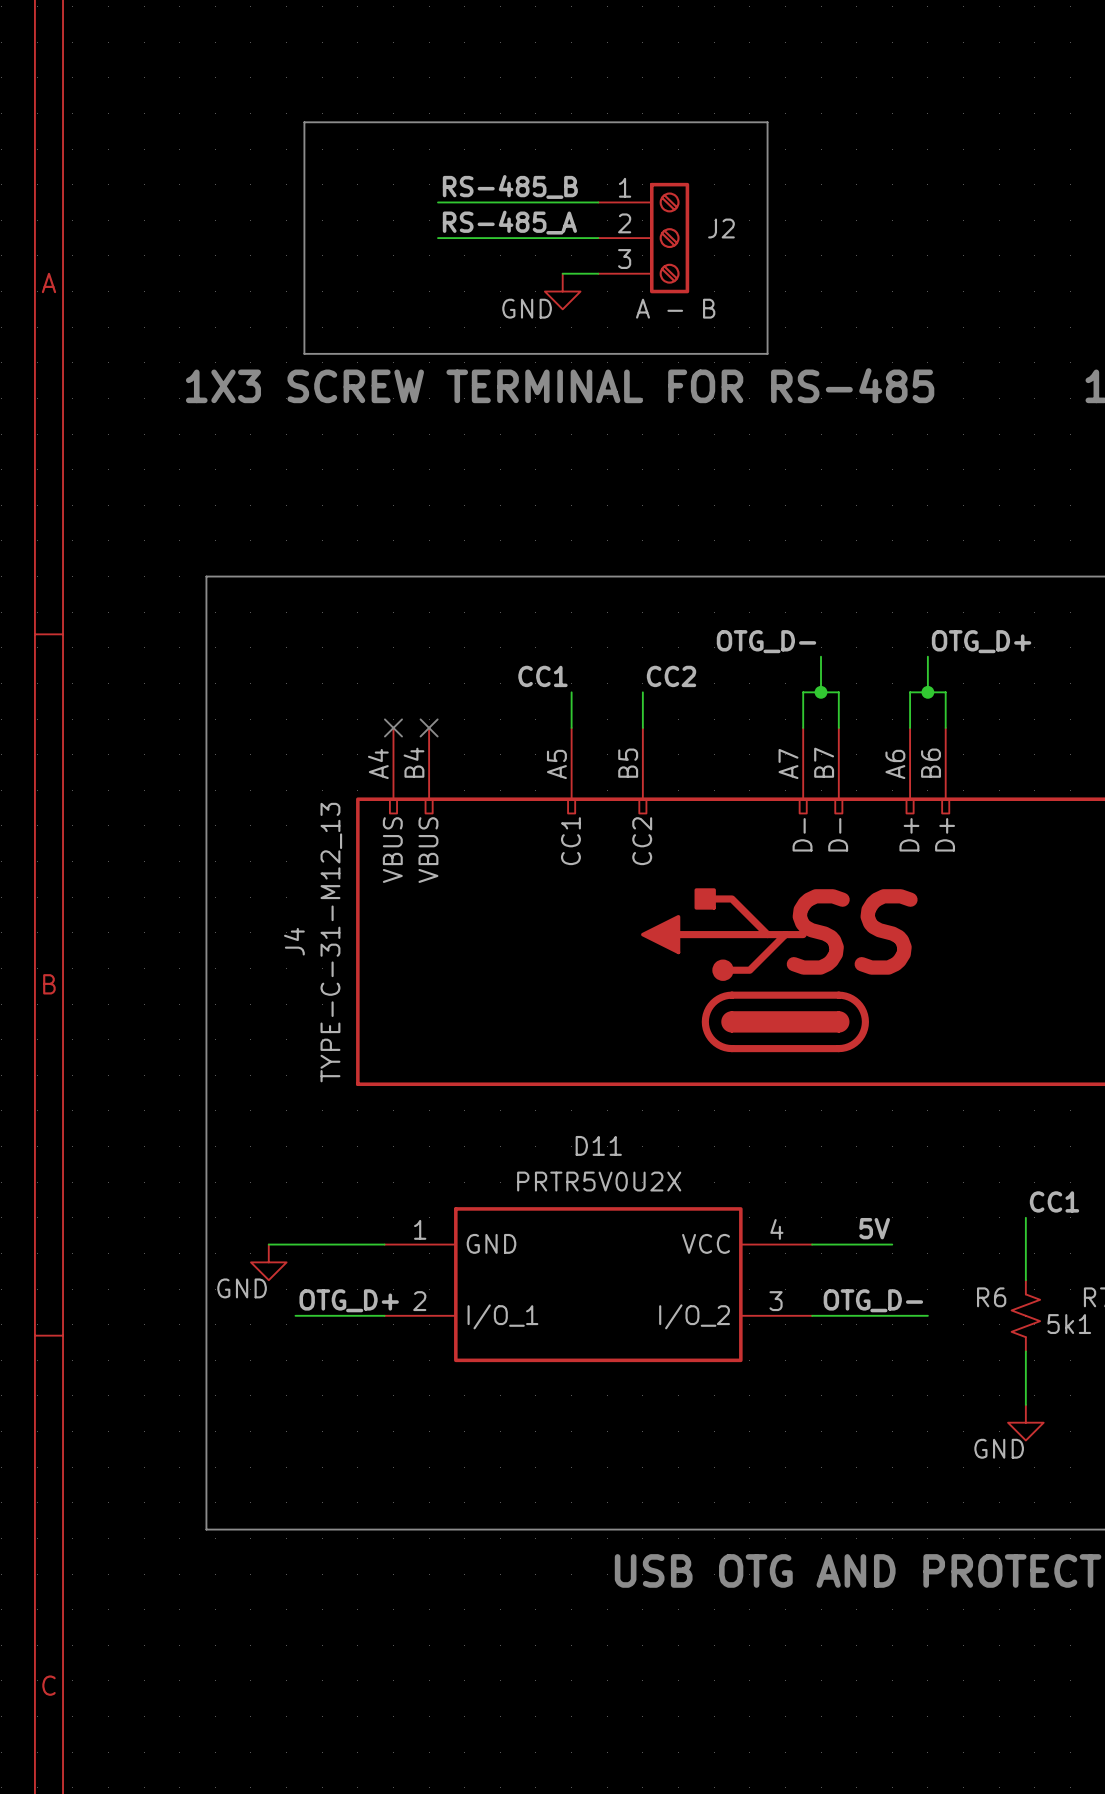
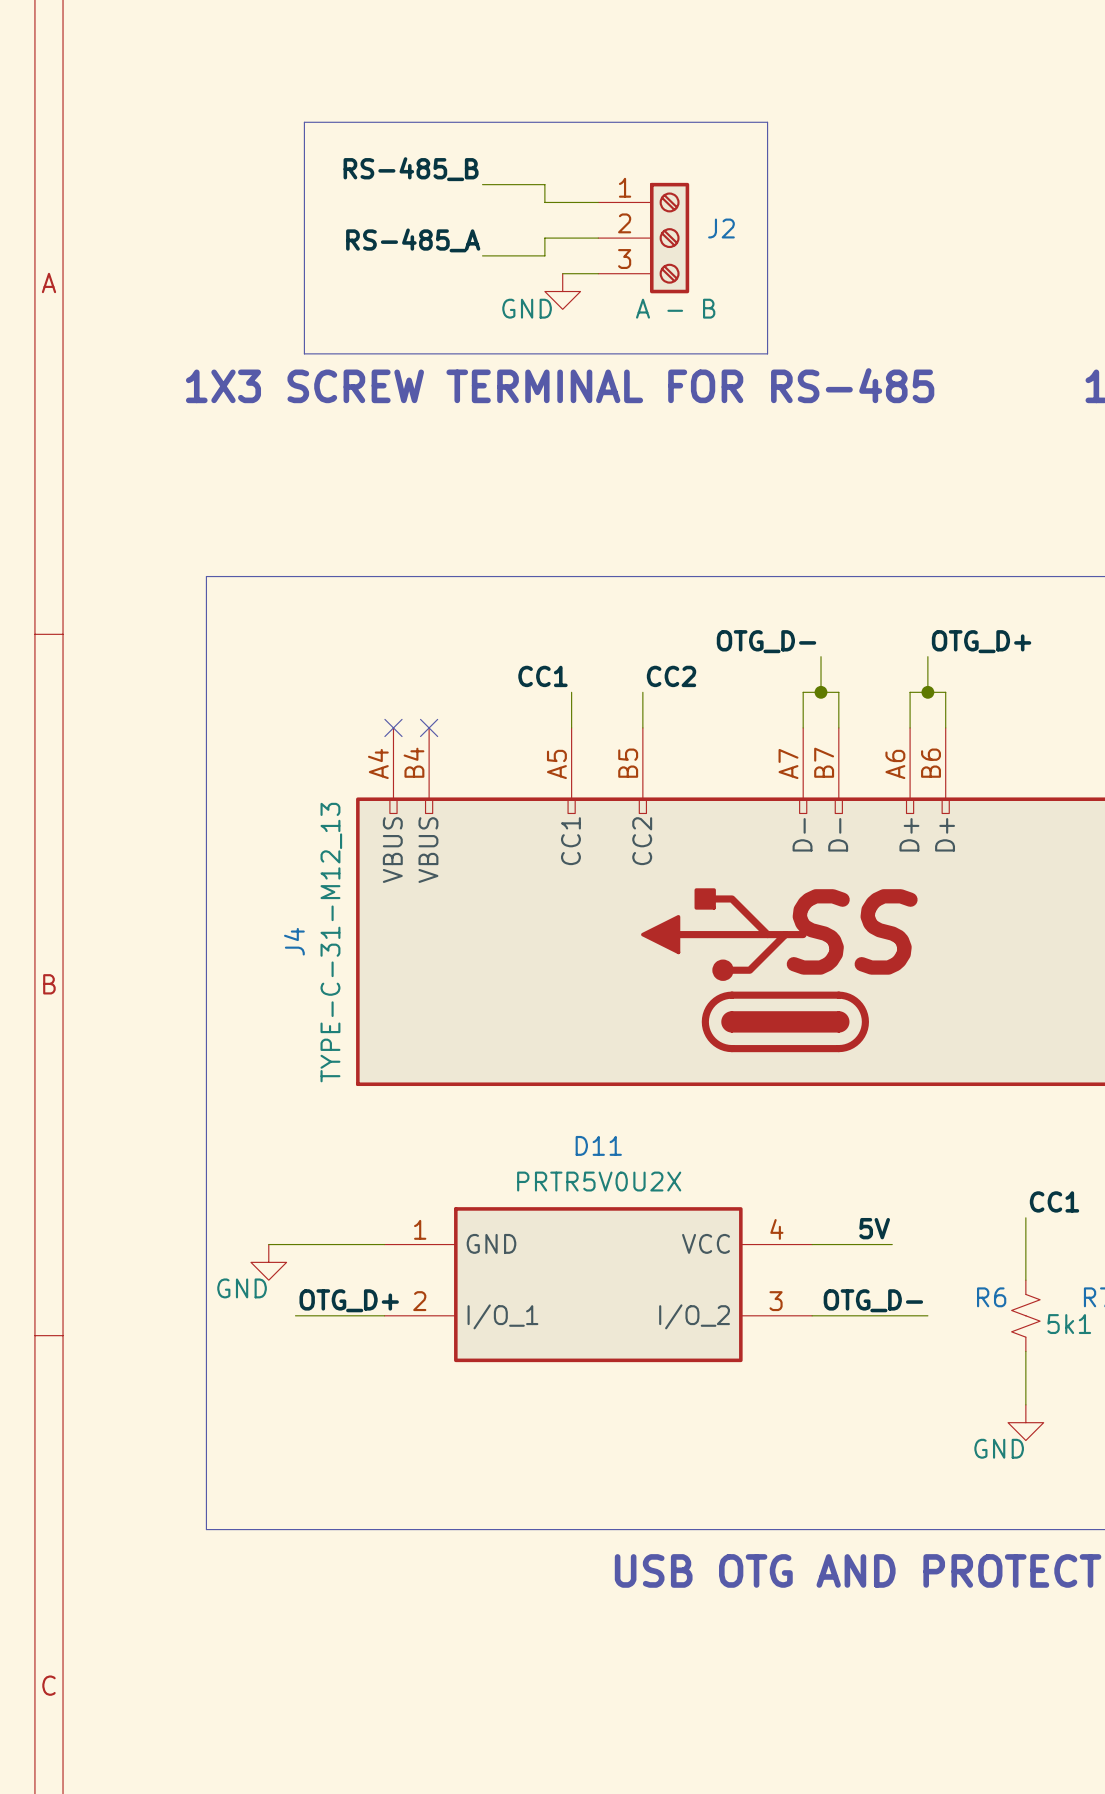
label position: RS-485_B (510, 186) -> RS-485_B (411, 169)
wire: (438, 202) (544, 202) -> (482, 184) (544, 184) (544, 202)
label position: RS-485_A (509, 222) -> RS-485_A (413, 240)
wire: (438, 238) (544, 238) -> (482, 255) (544, 255) (544, 238)

